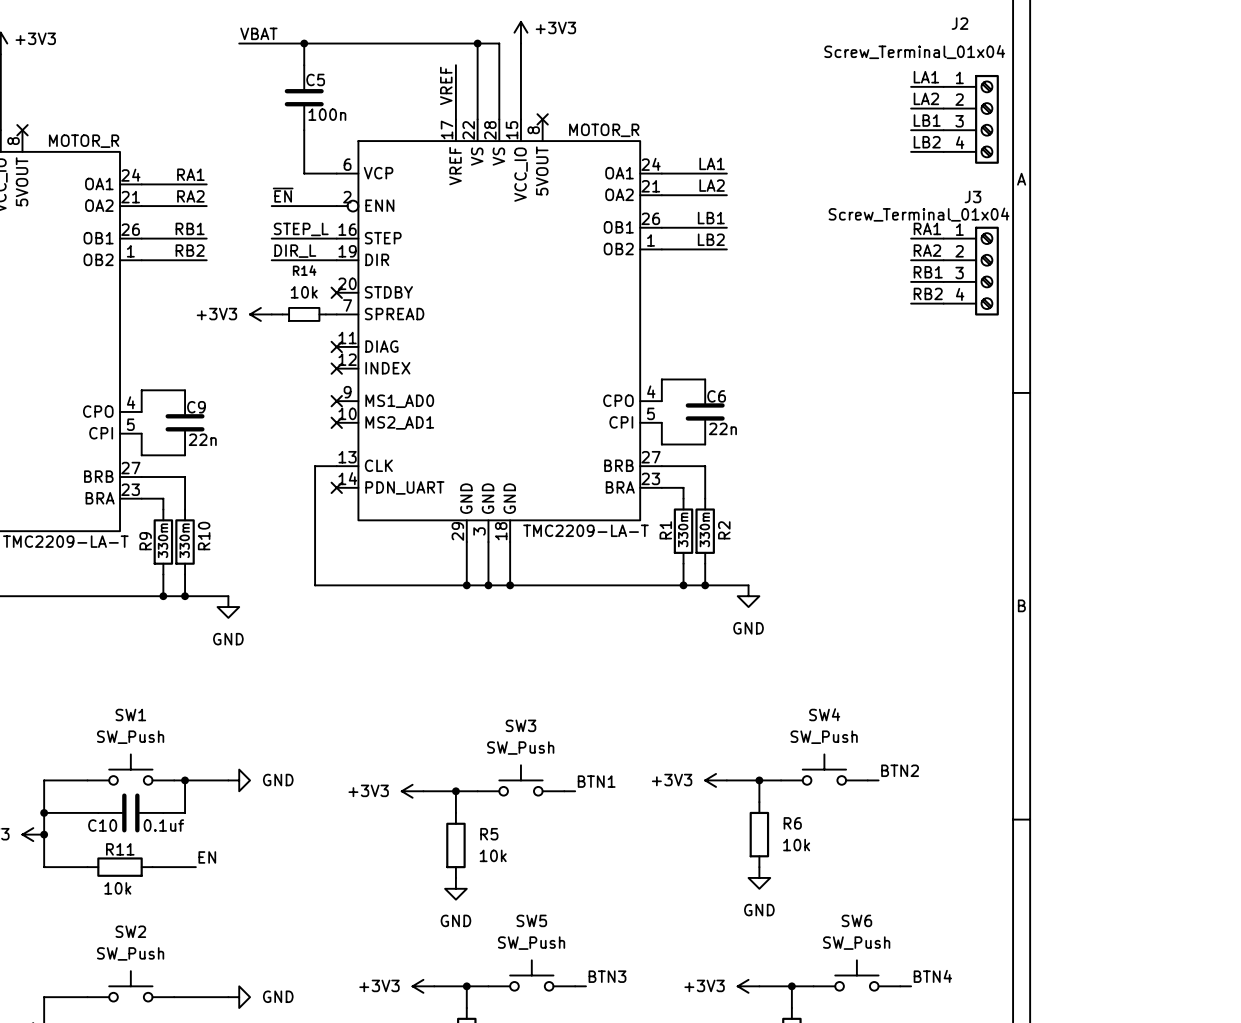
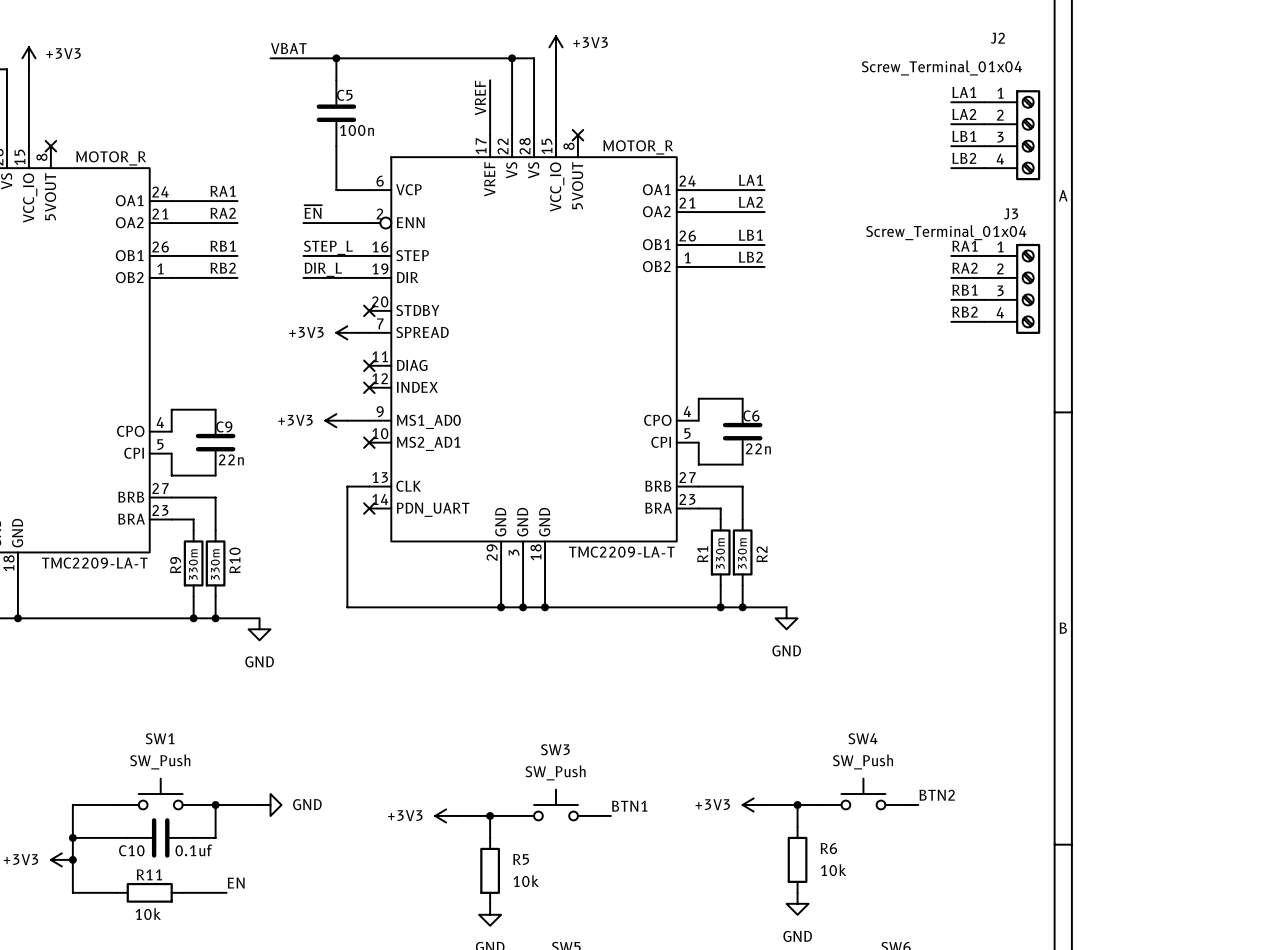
power symbol: +3V3 (260, 314) -> none
wire: (271, 314) (282, 314) -> none
R14: 10k (304, 314) -> none
power symbol: none -> +3V3 (347, 332)
power symbol: none -> +3V3 (336, 420)
wire: none -> (347, 420) (369, 420)
no-connect mark: (336, 401) -> none

